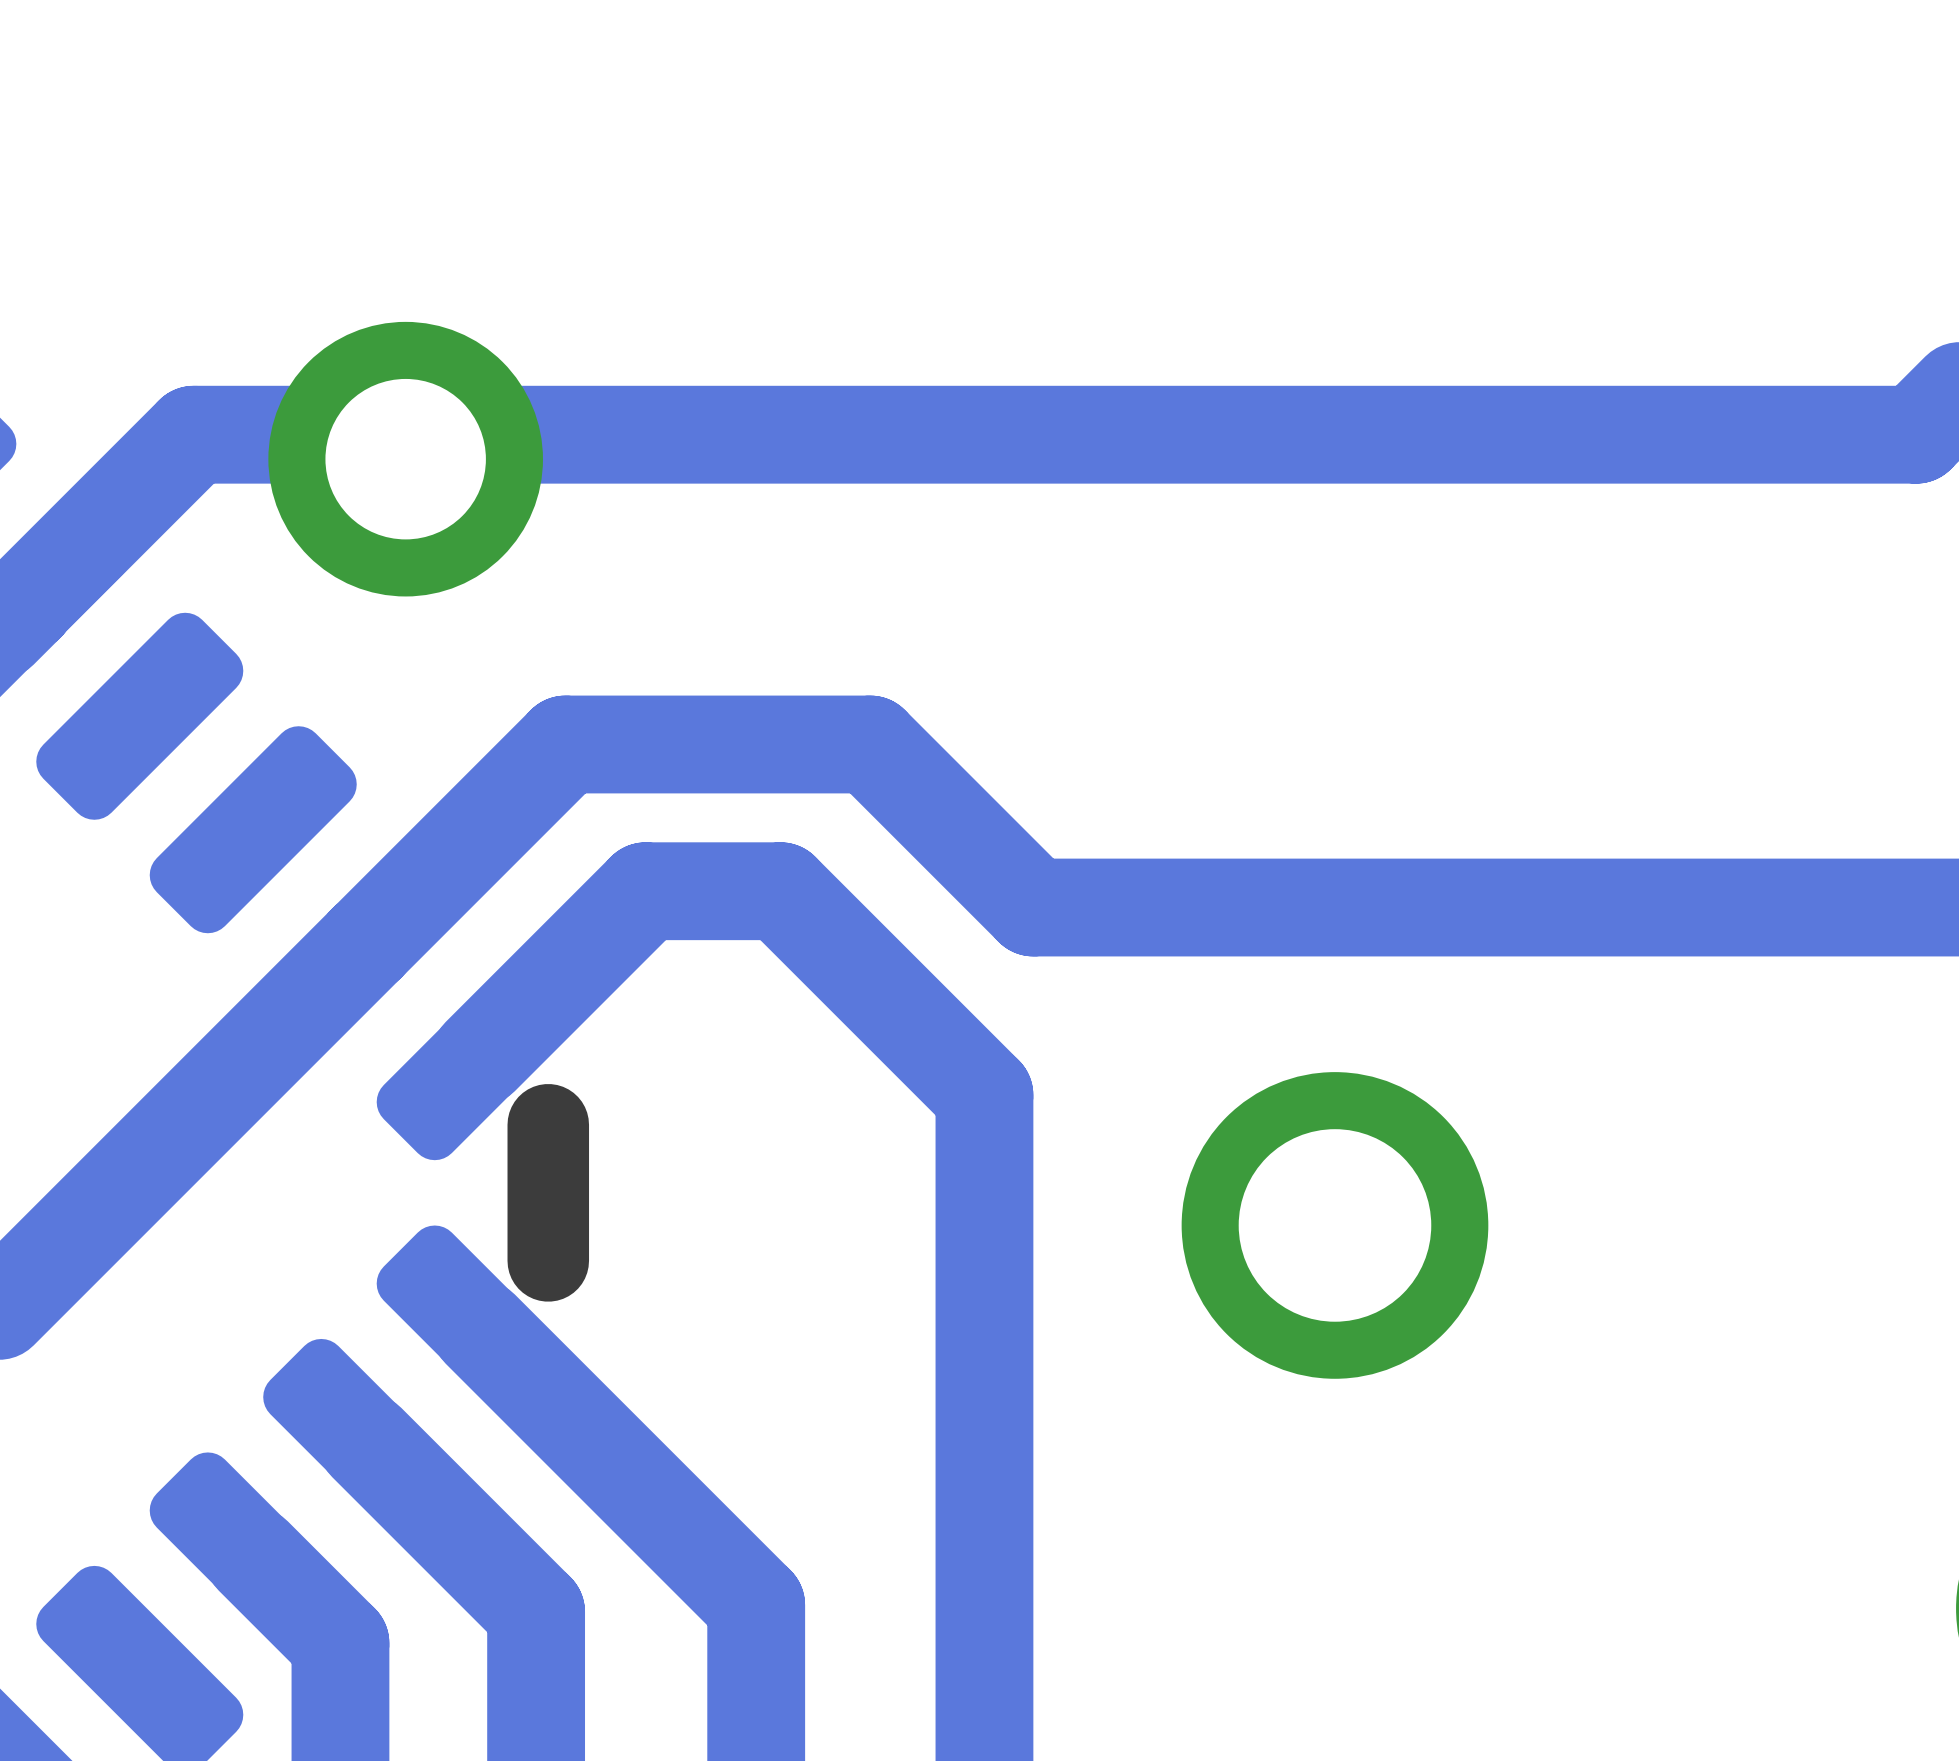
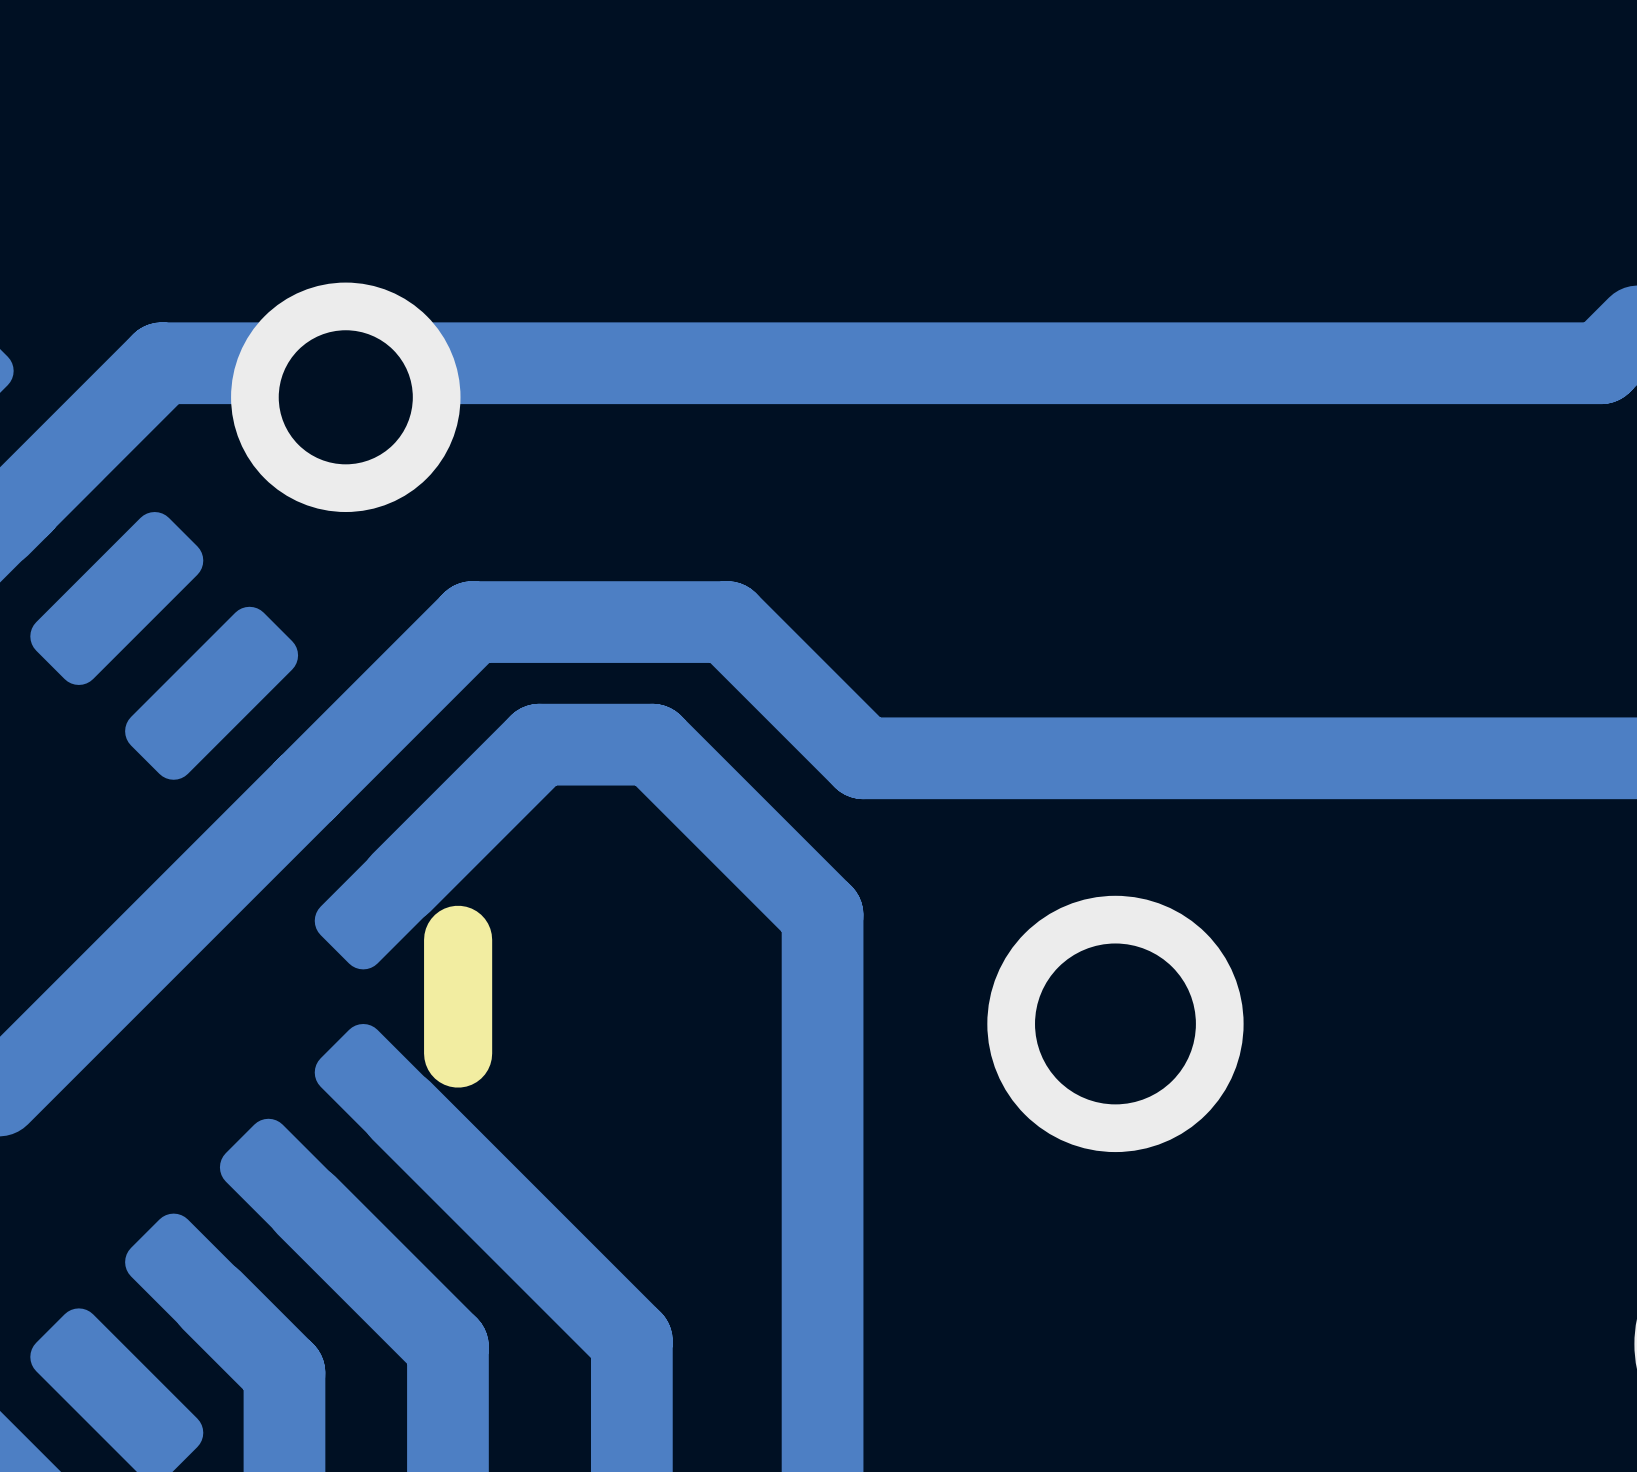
via position: (405, 459) -> (345, 397)

